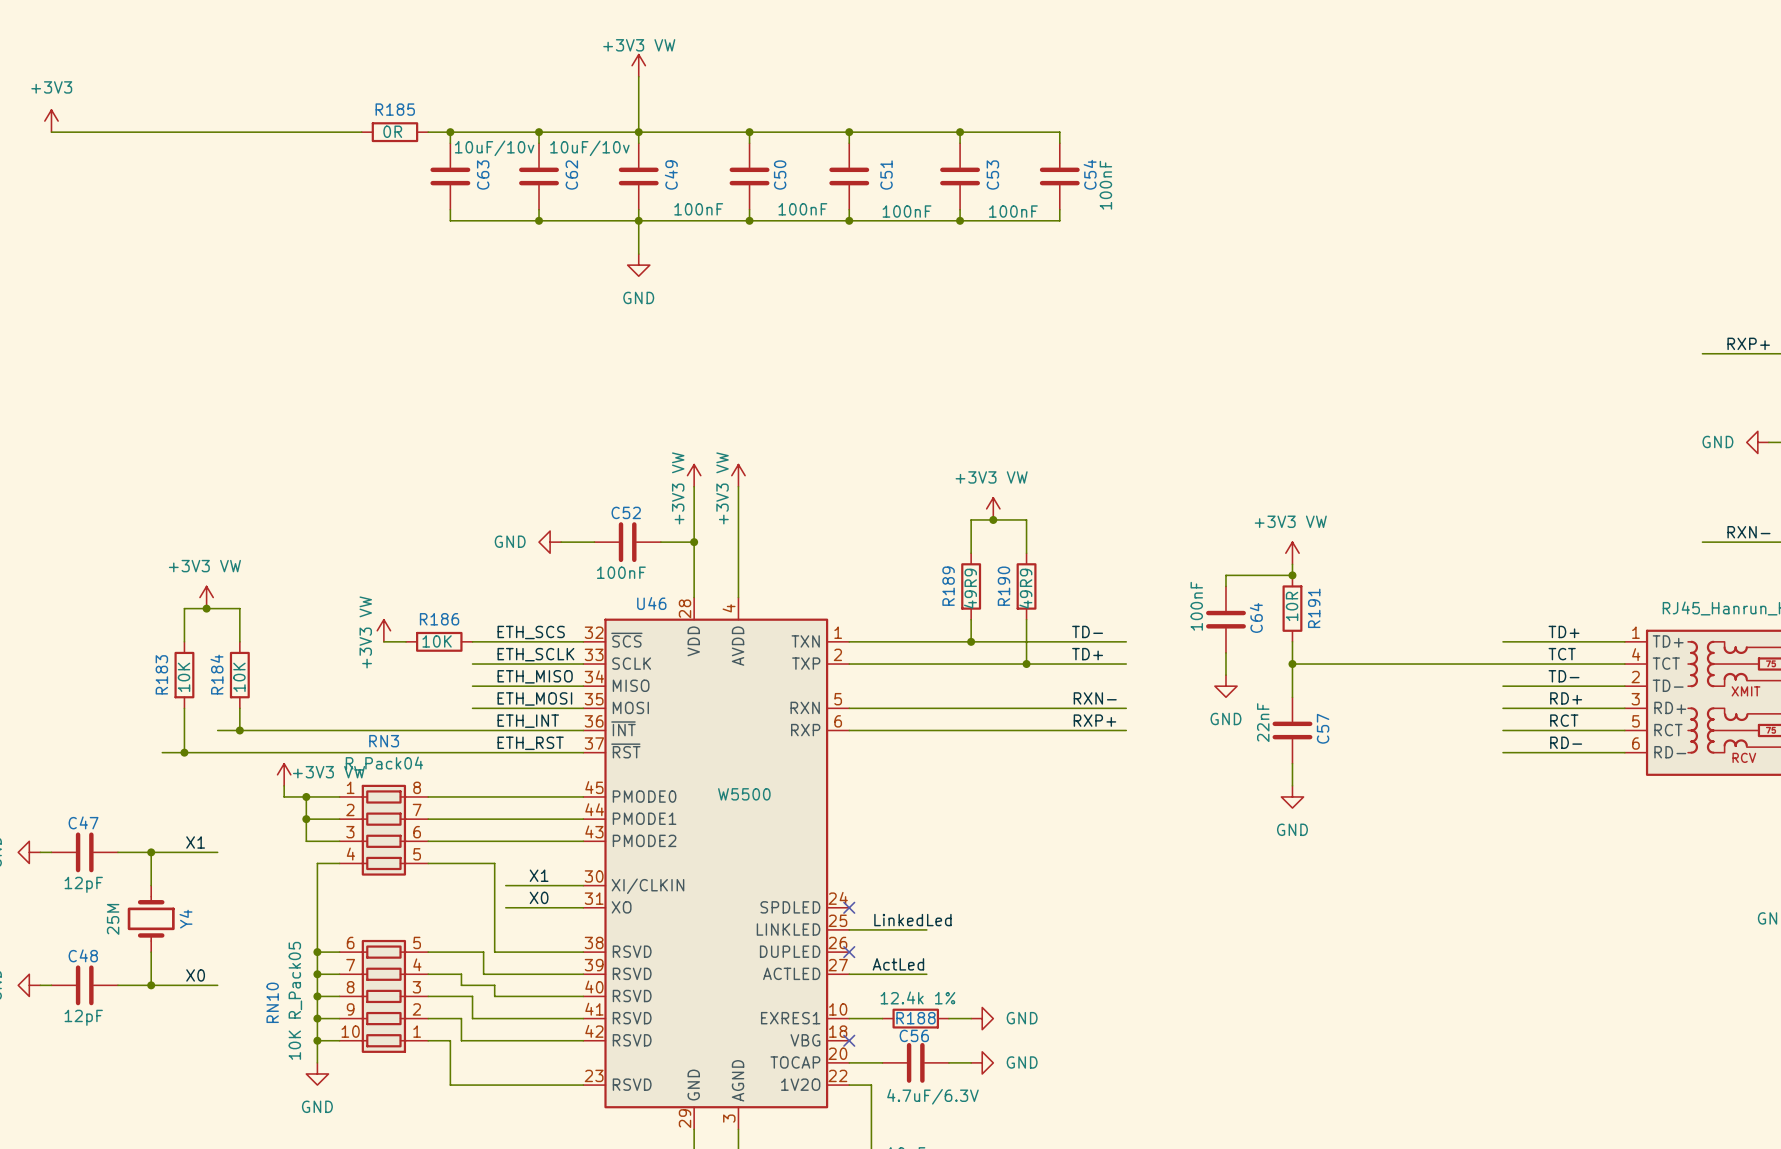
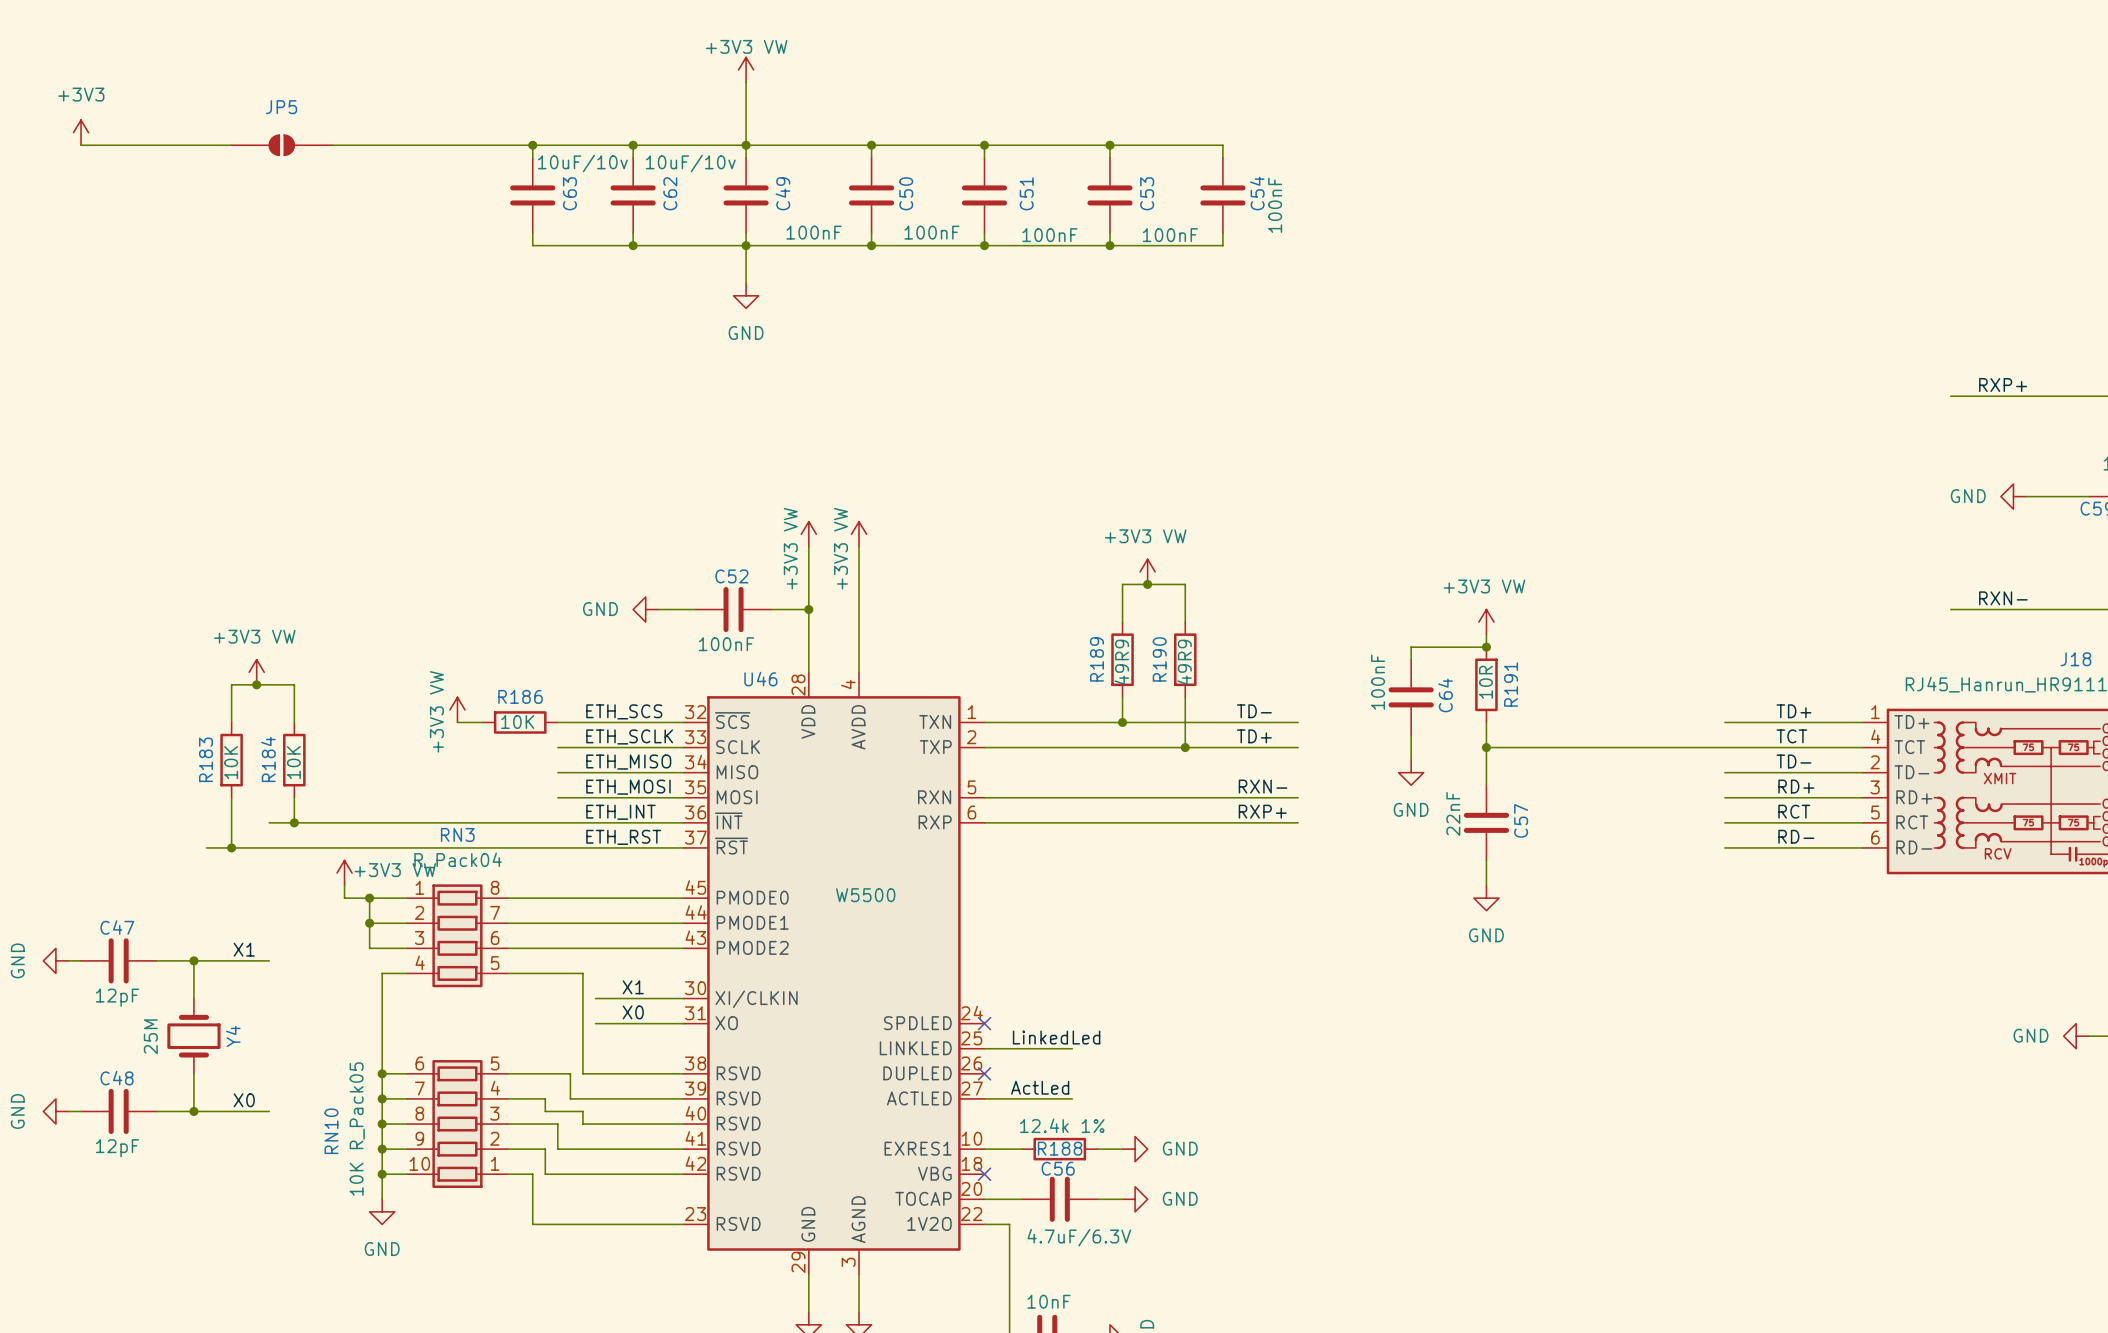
JP5: none -> (281, 145)
wire: none -> (432, 145) (507, 145)
R185: 0R (394, 132) -> none

